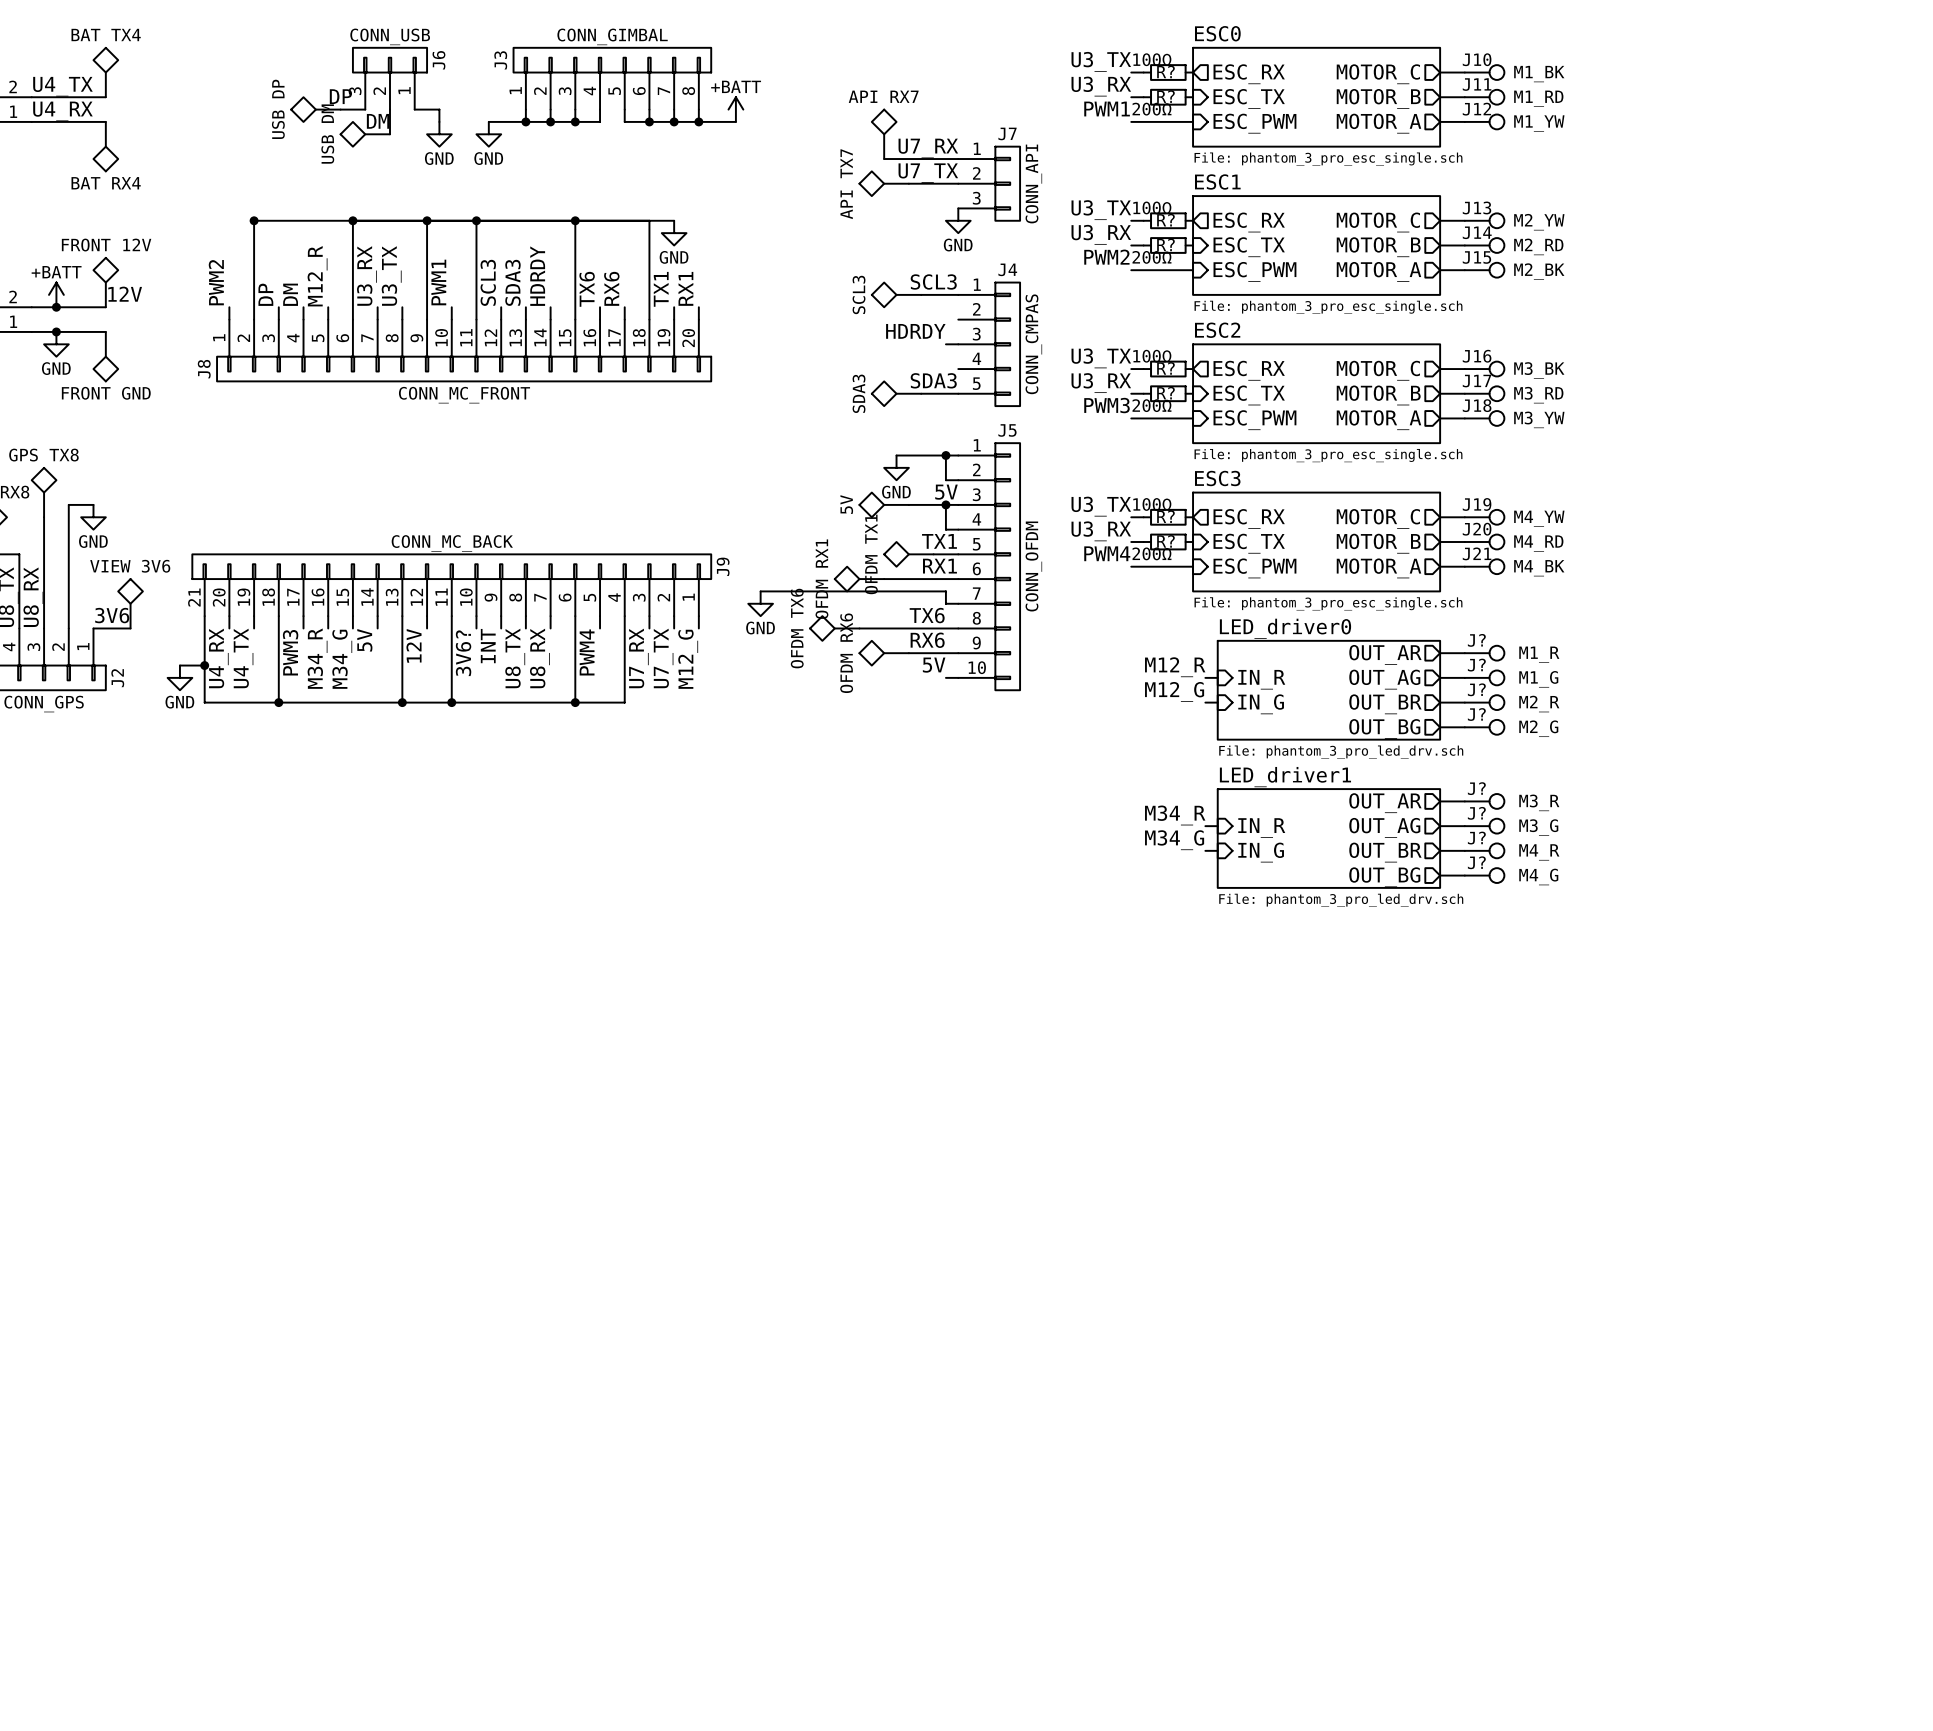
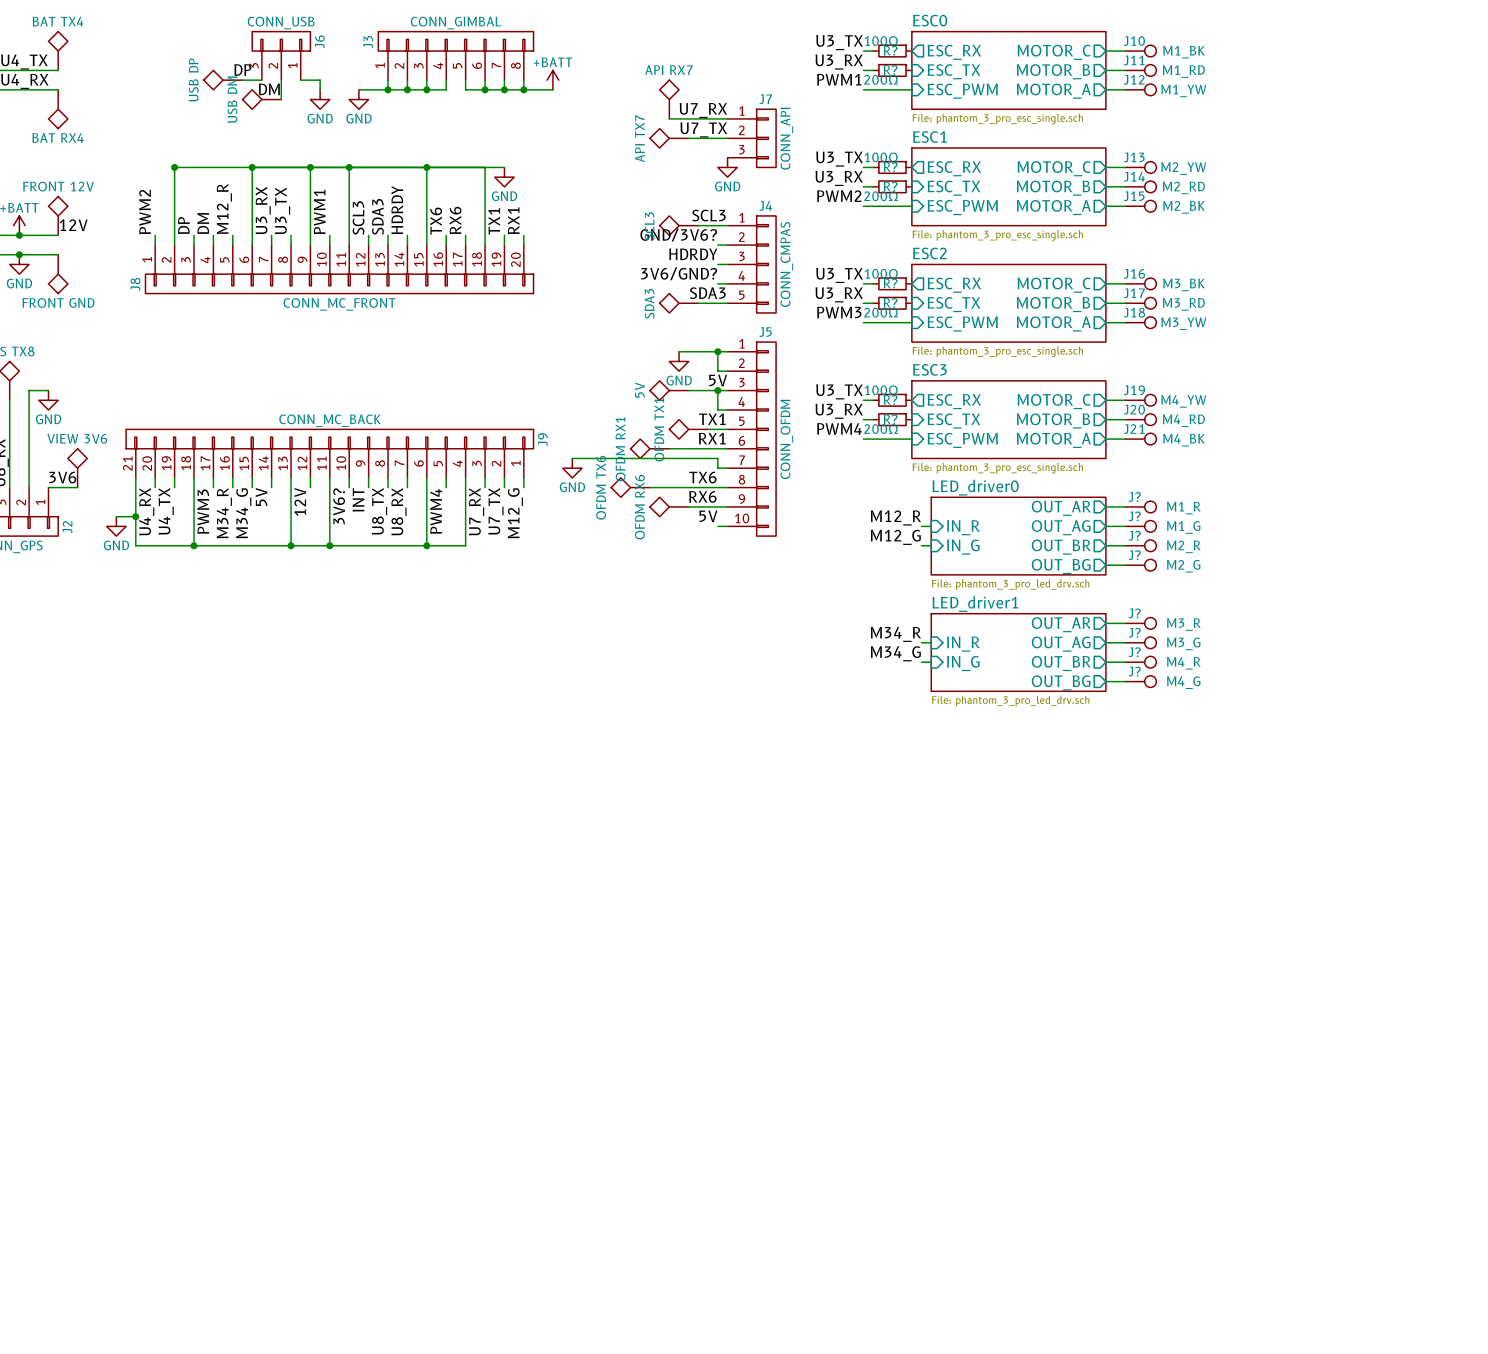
label: none -> GND/3V6? (678, 234)
wire: none -> (717, 245) (727, 245)
label: none -> 3V6/GND? (679, 273)
wire: none -> (717, 283) (727, 283)

